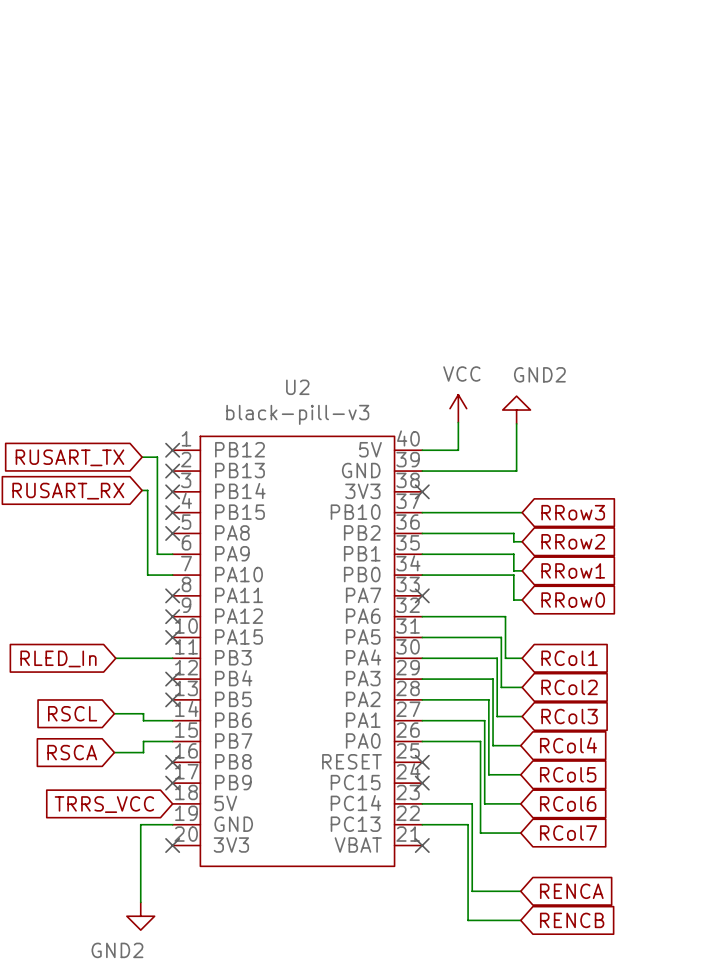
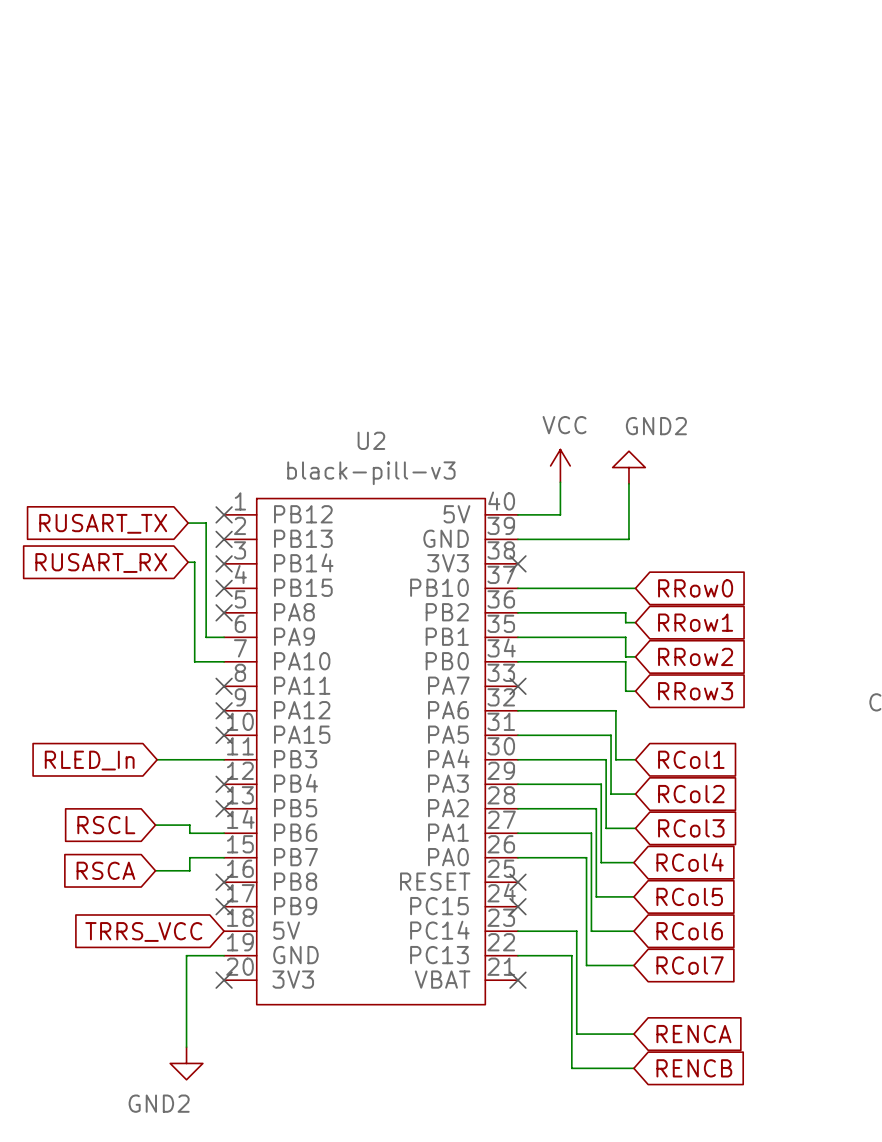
global label: RRow3 (573, 512) -> RRow0 (695, 588)
global label: RRow2 (573, 541) -> RRow1 (695, 622)
global label: RRow1 (573, 570) -> RRow2 (695, 656)
global label: RRow0 (573, 600) -> RRow3 (695, 691)

